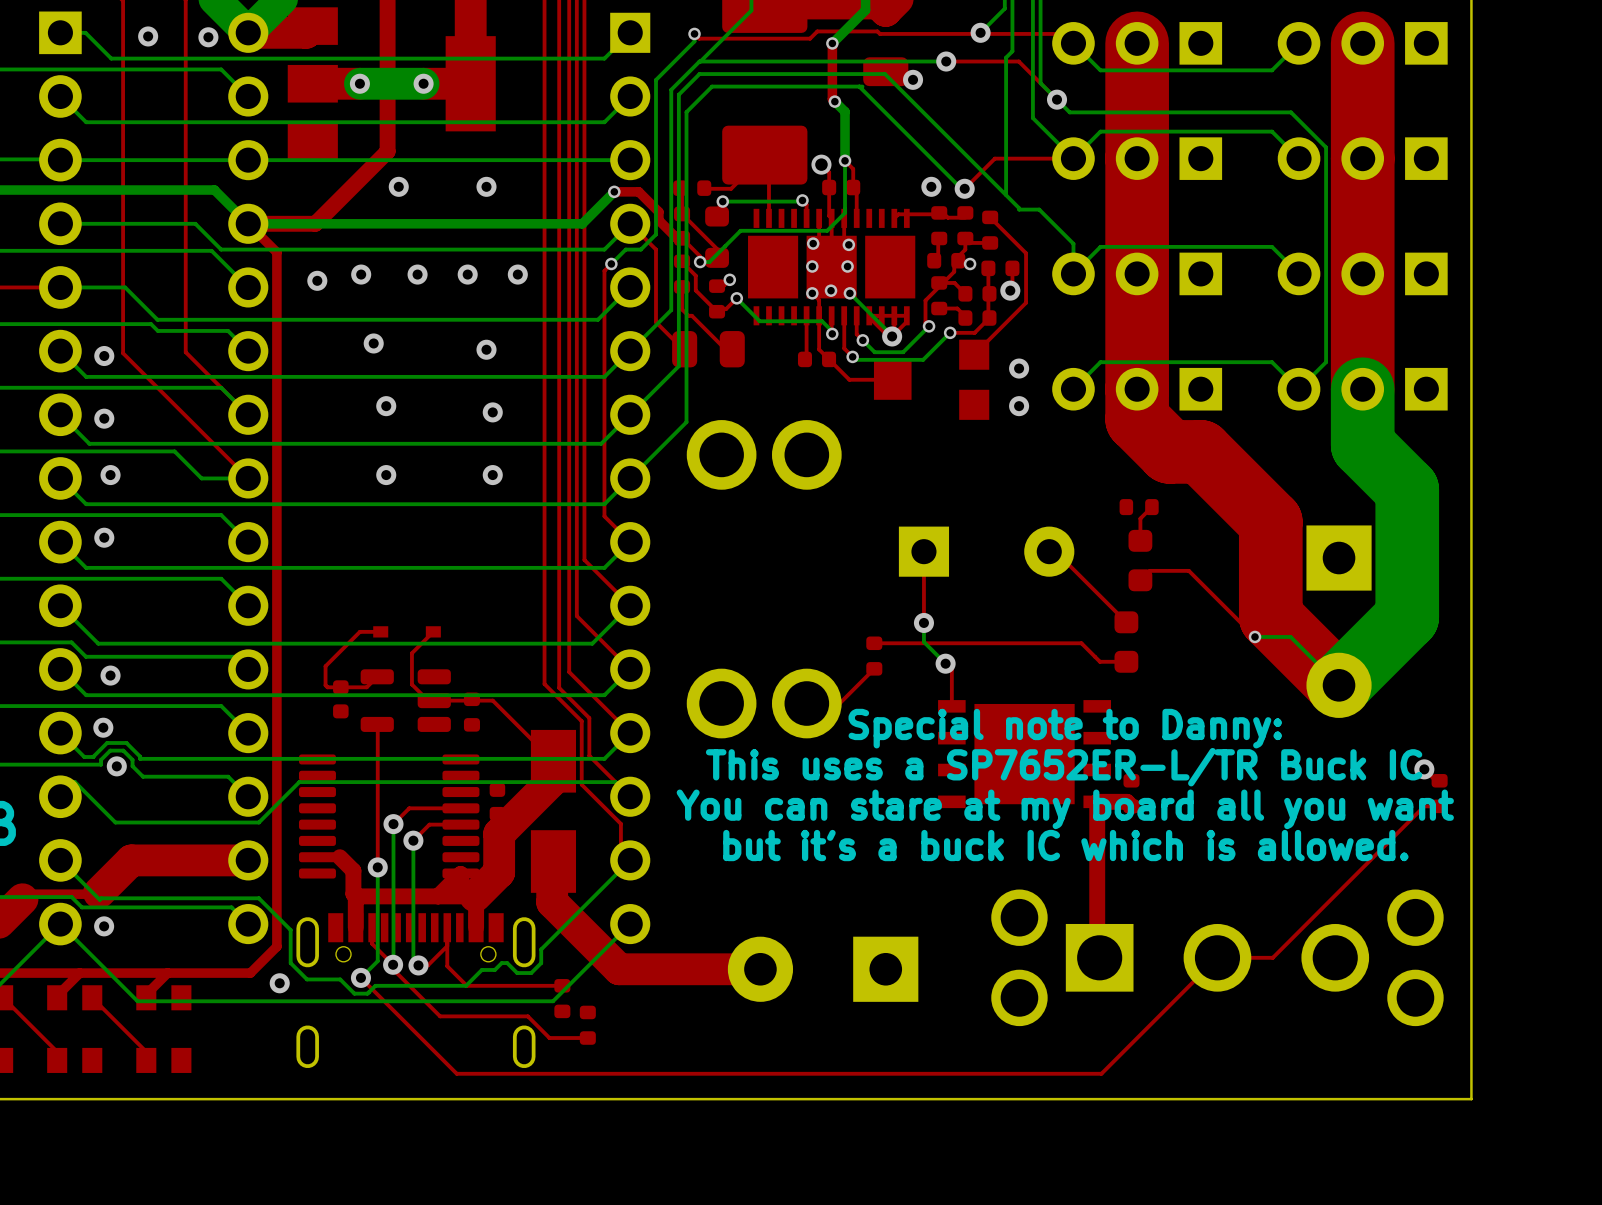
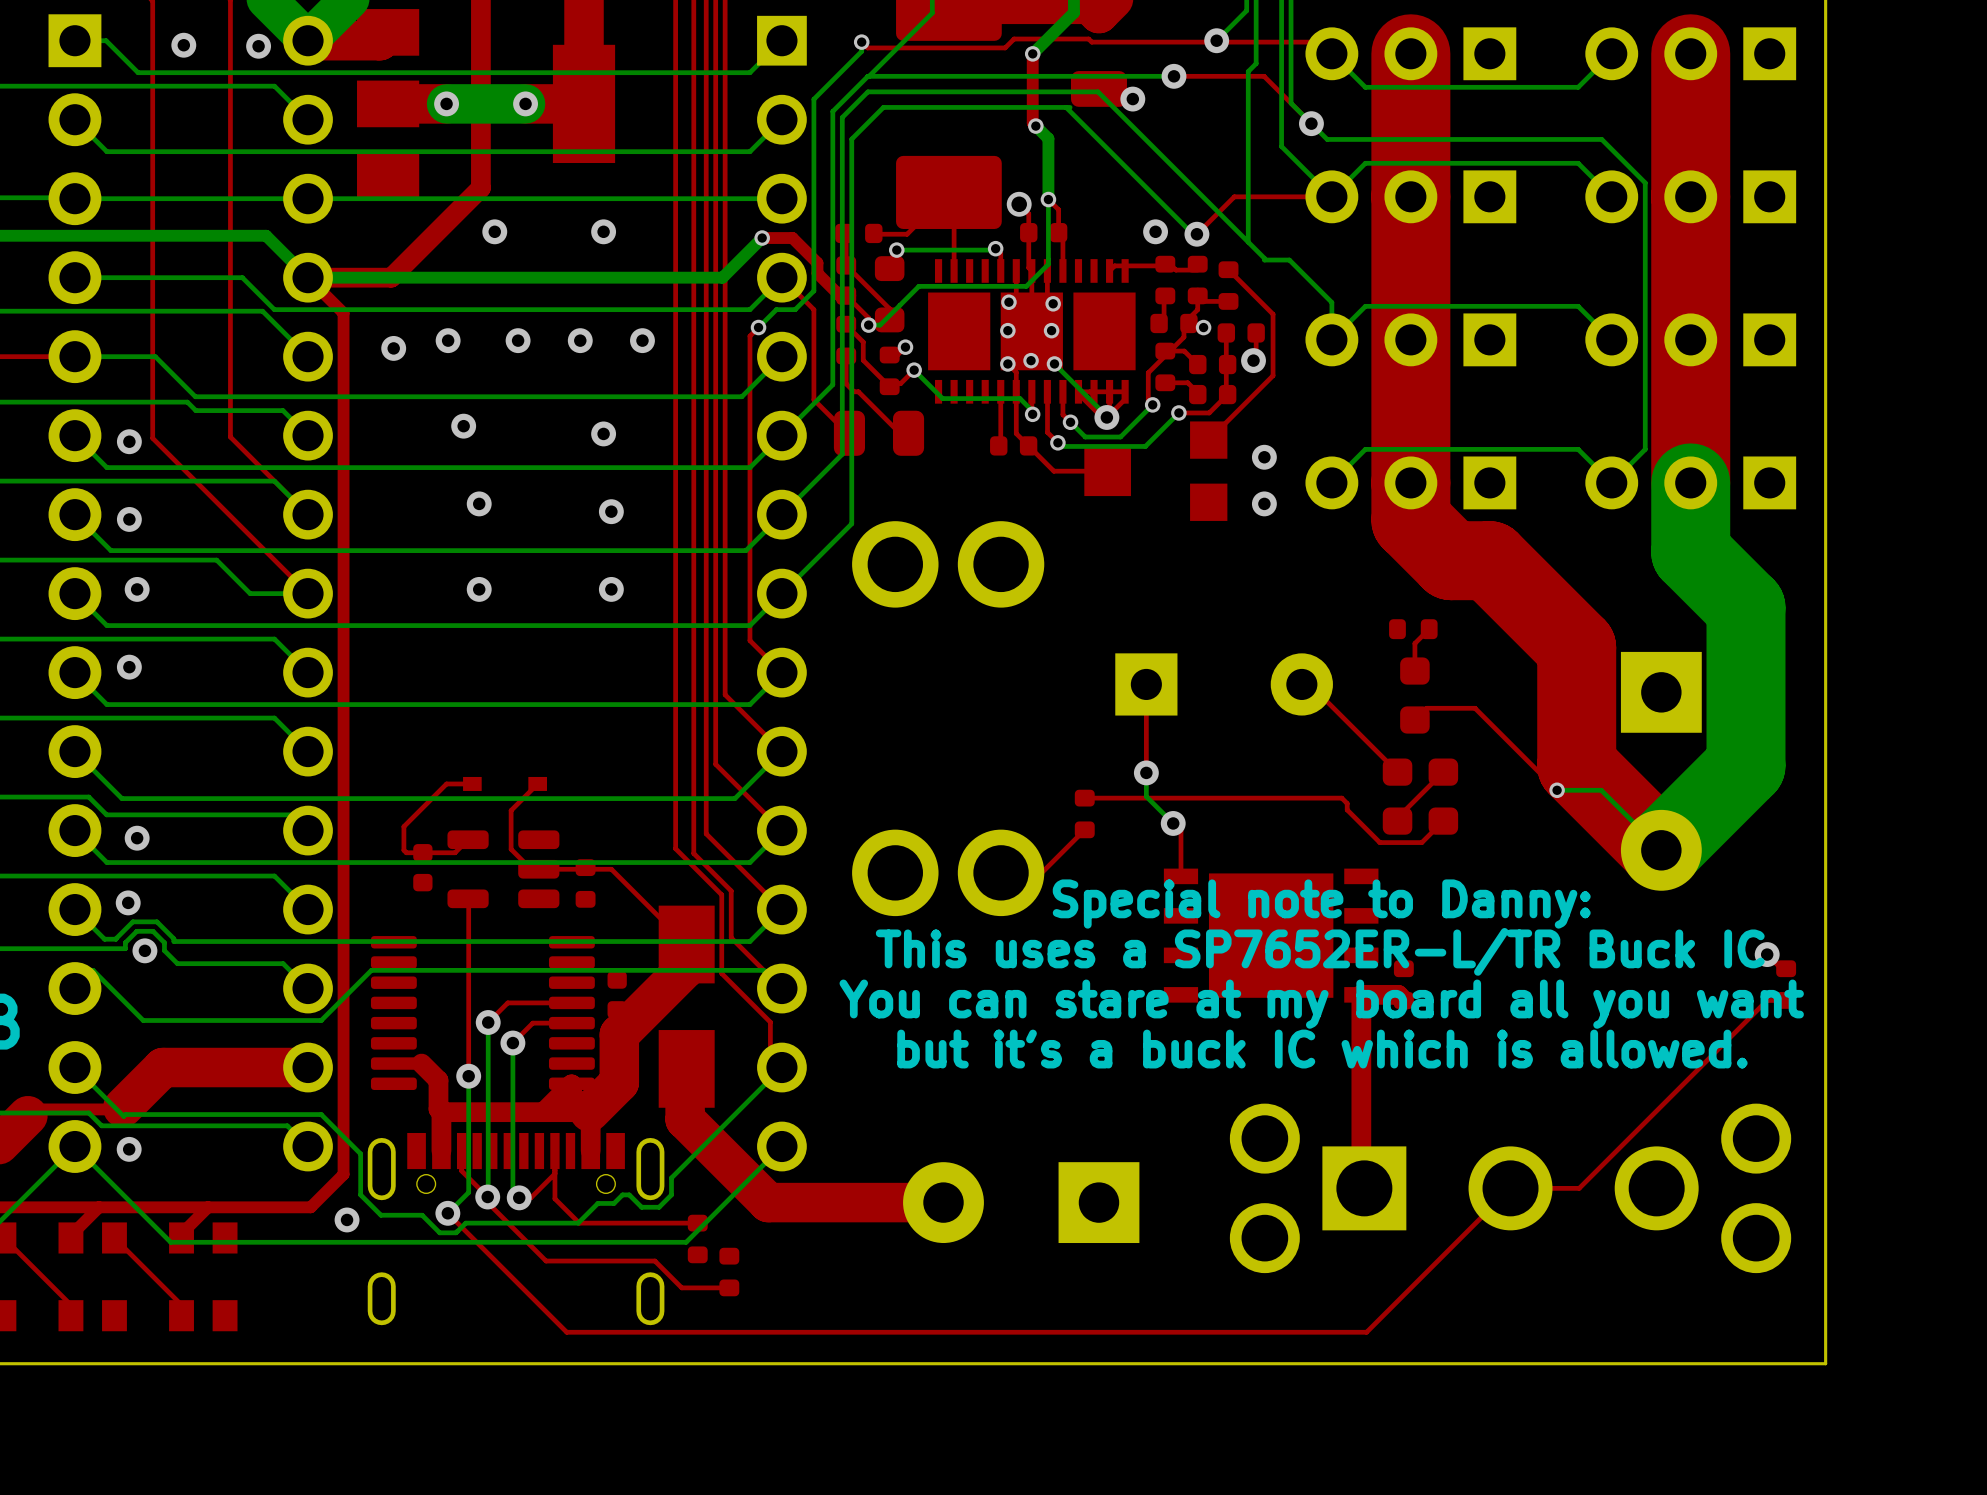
top track: none -> (1443, 772) (1393, 821)
part: none -> (1443, 796)
top track: (1085, 647) (1100, 661) (1126, 661) -> (1347, 803) (1347, 809) (1379, 842) (1421, 842) (1443, 821)

